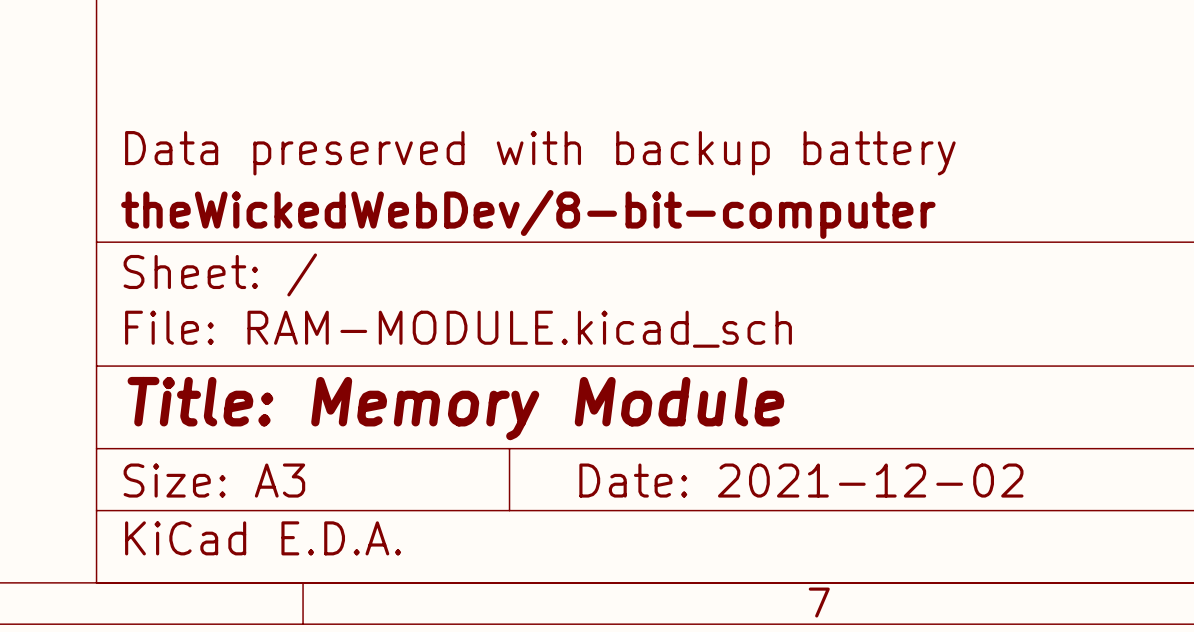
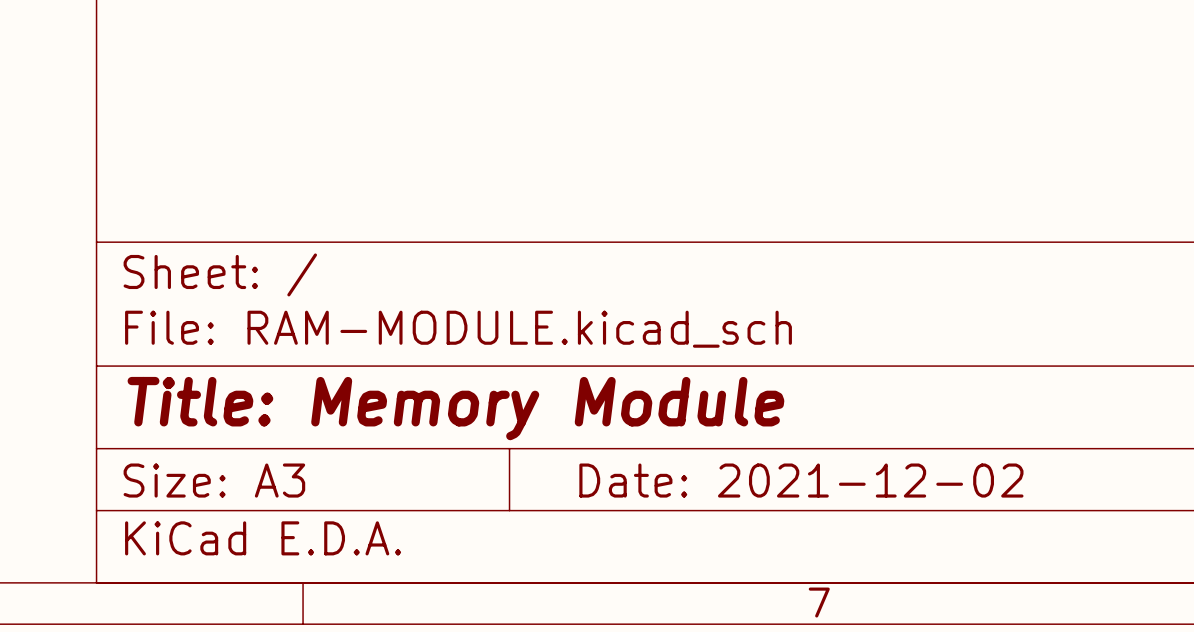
title block: Data preserved with backup battery (540, 153) -> none
title block: theWickedWebDev/8-bit-computer (528, 214) -> none

